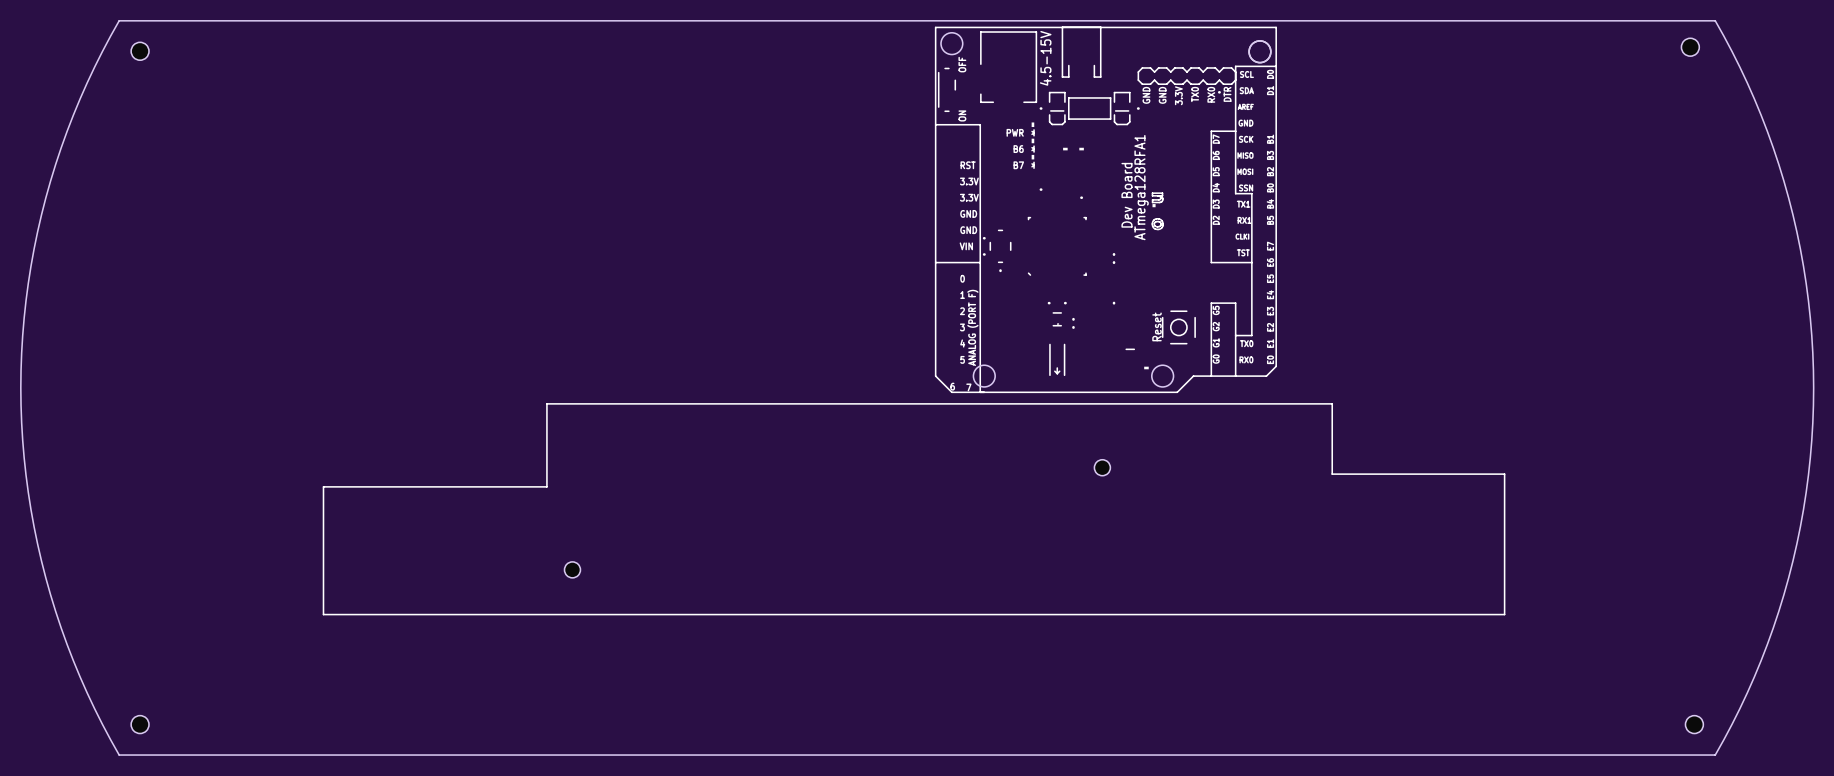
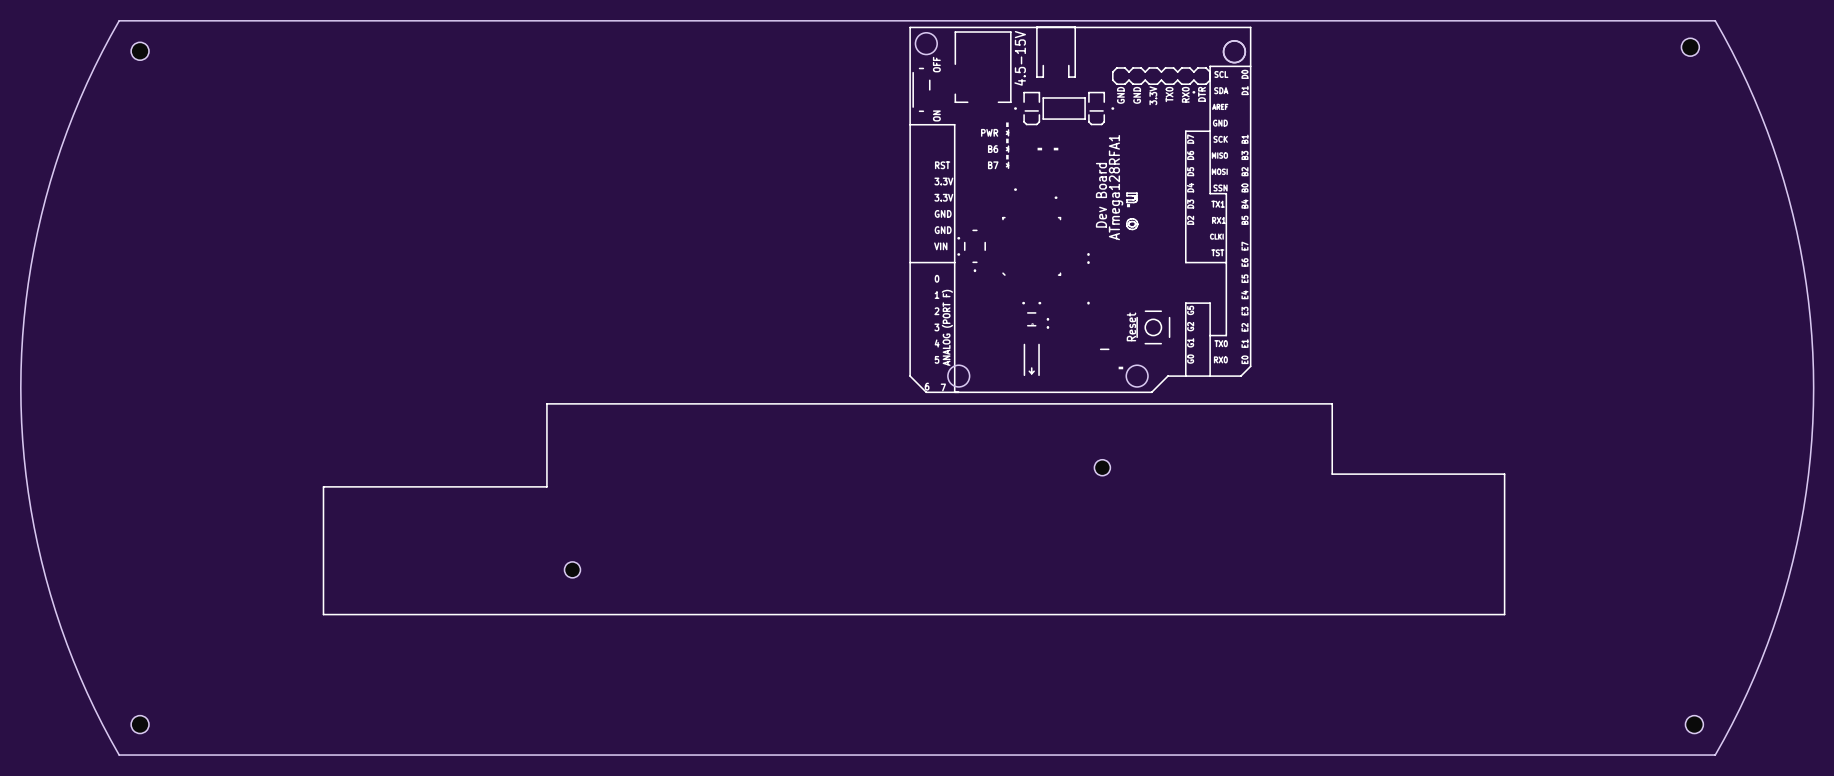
drawing position: (1105, 209) -> (1080, 209)

